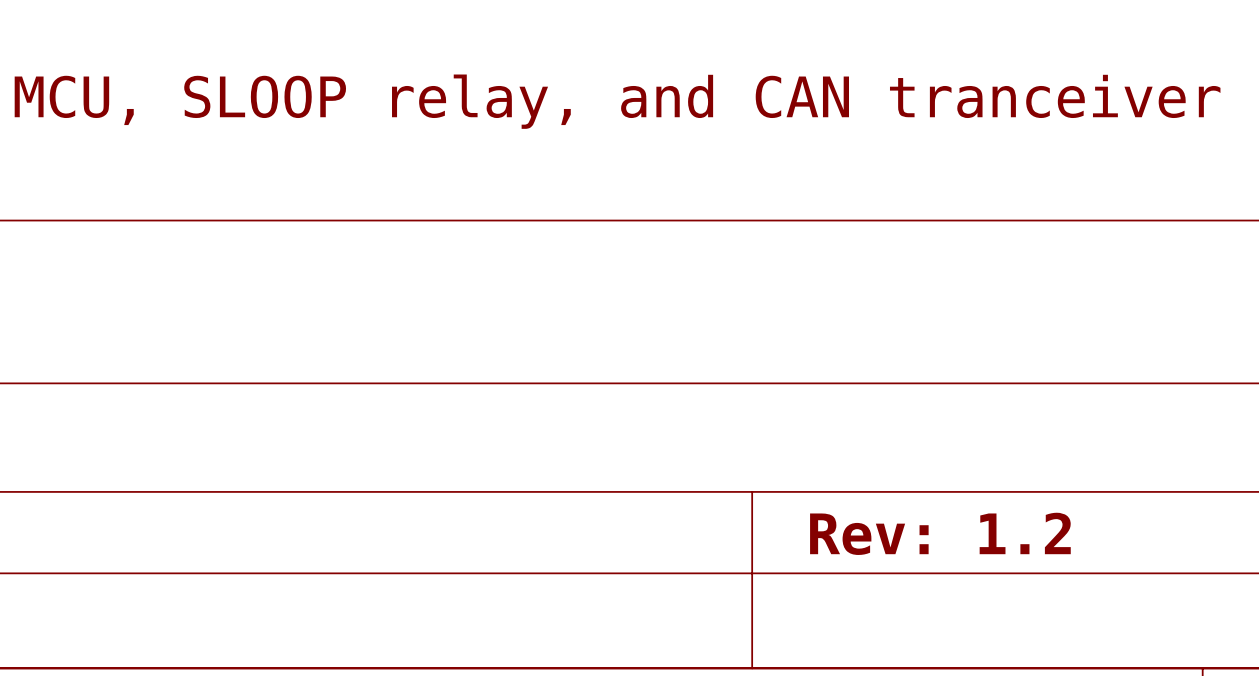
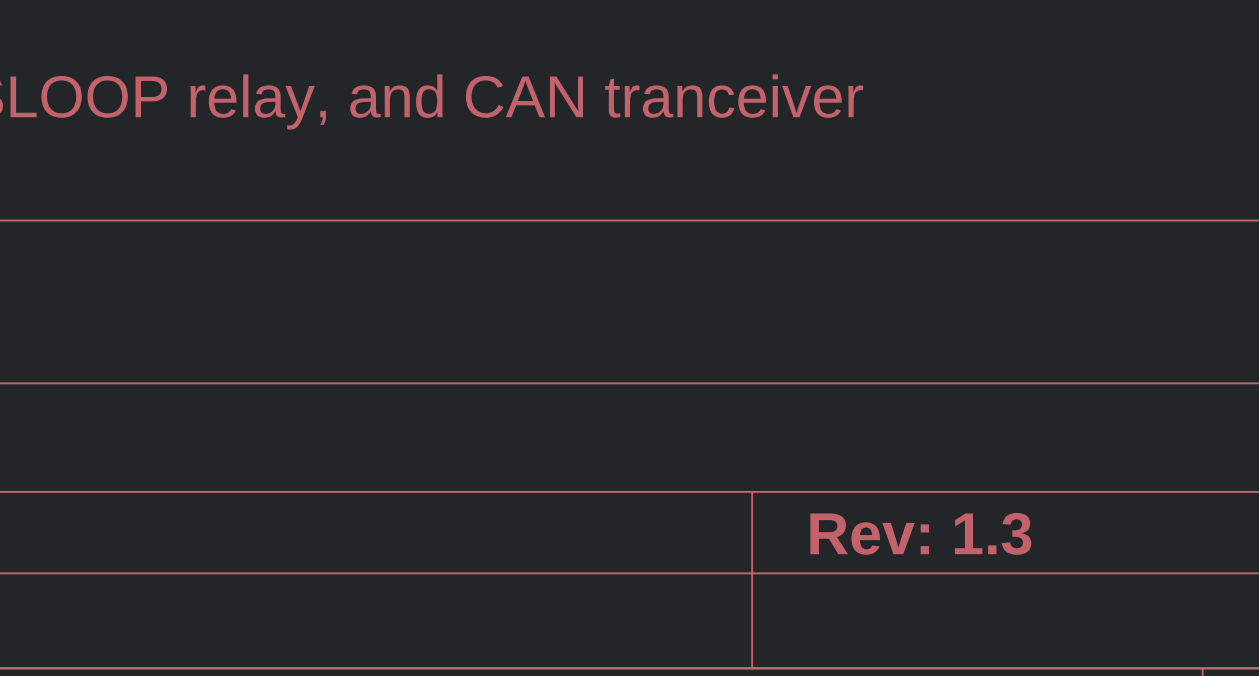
title block: Rev: 1.2 (940, 533) -> Rev: 1.3 (920, 533)

